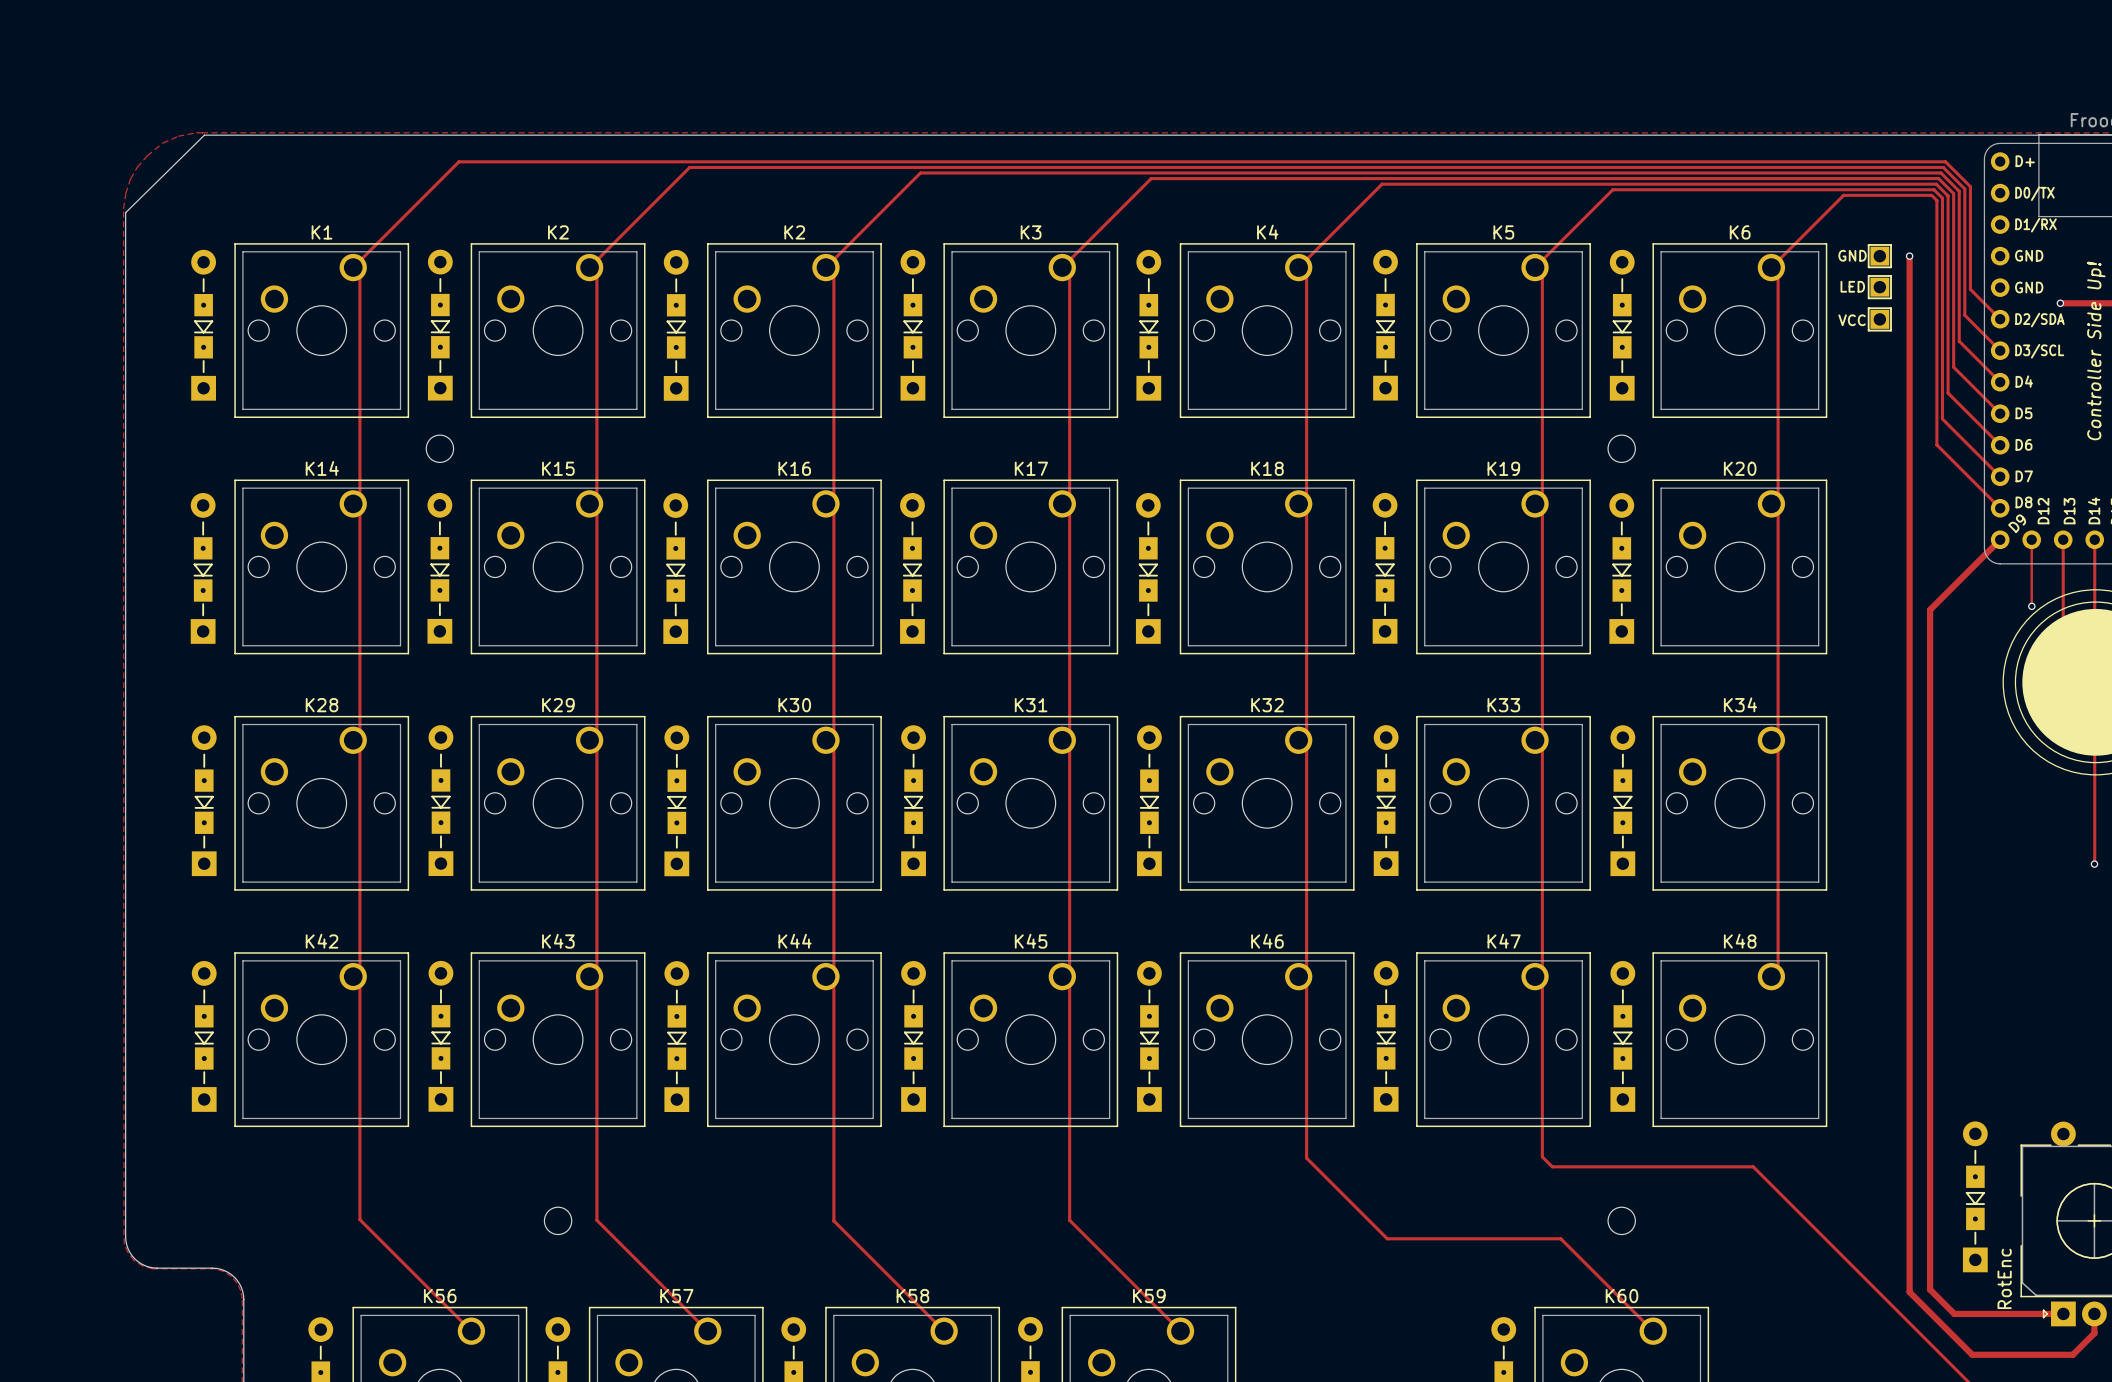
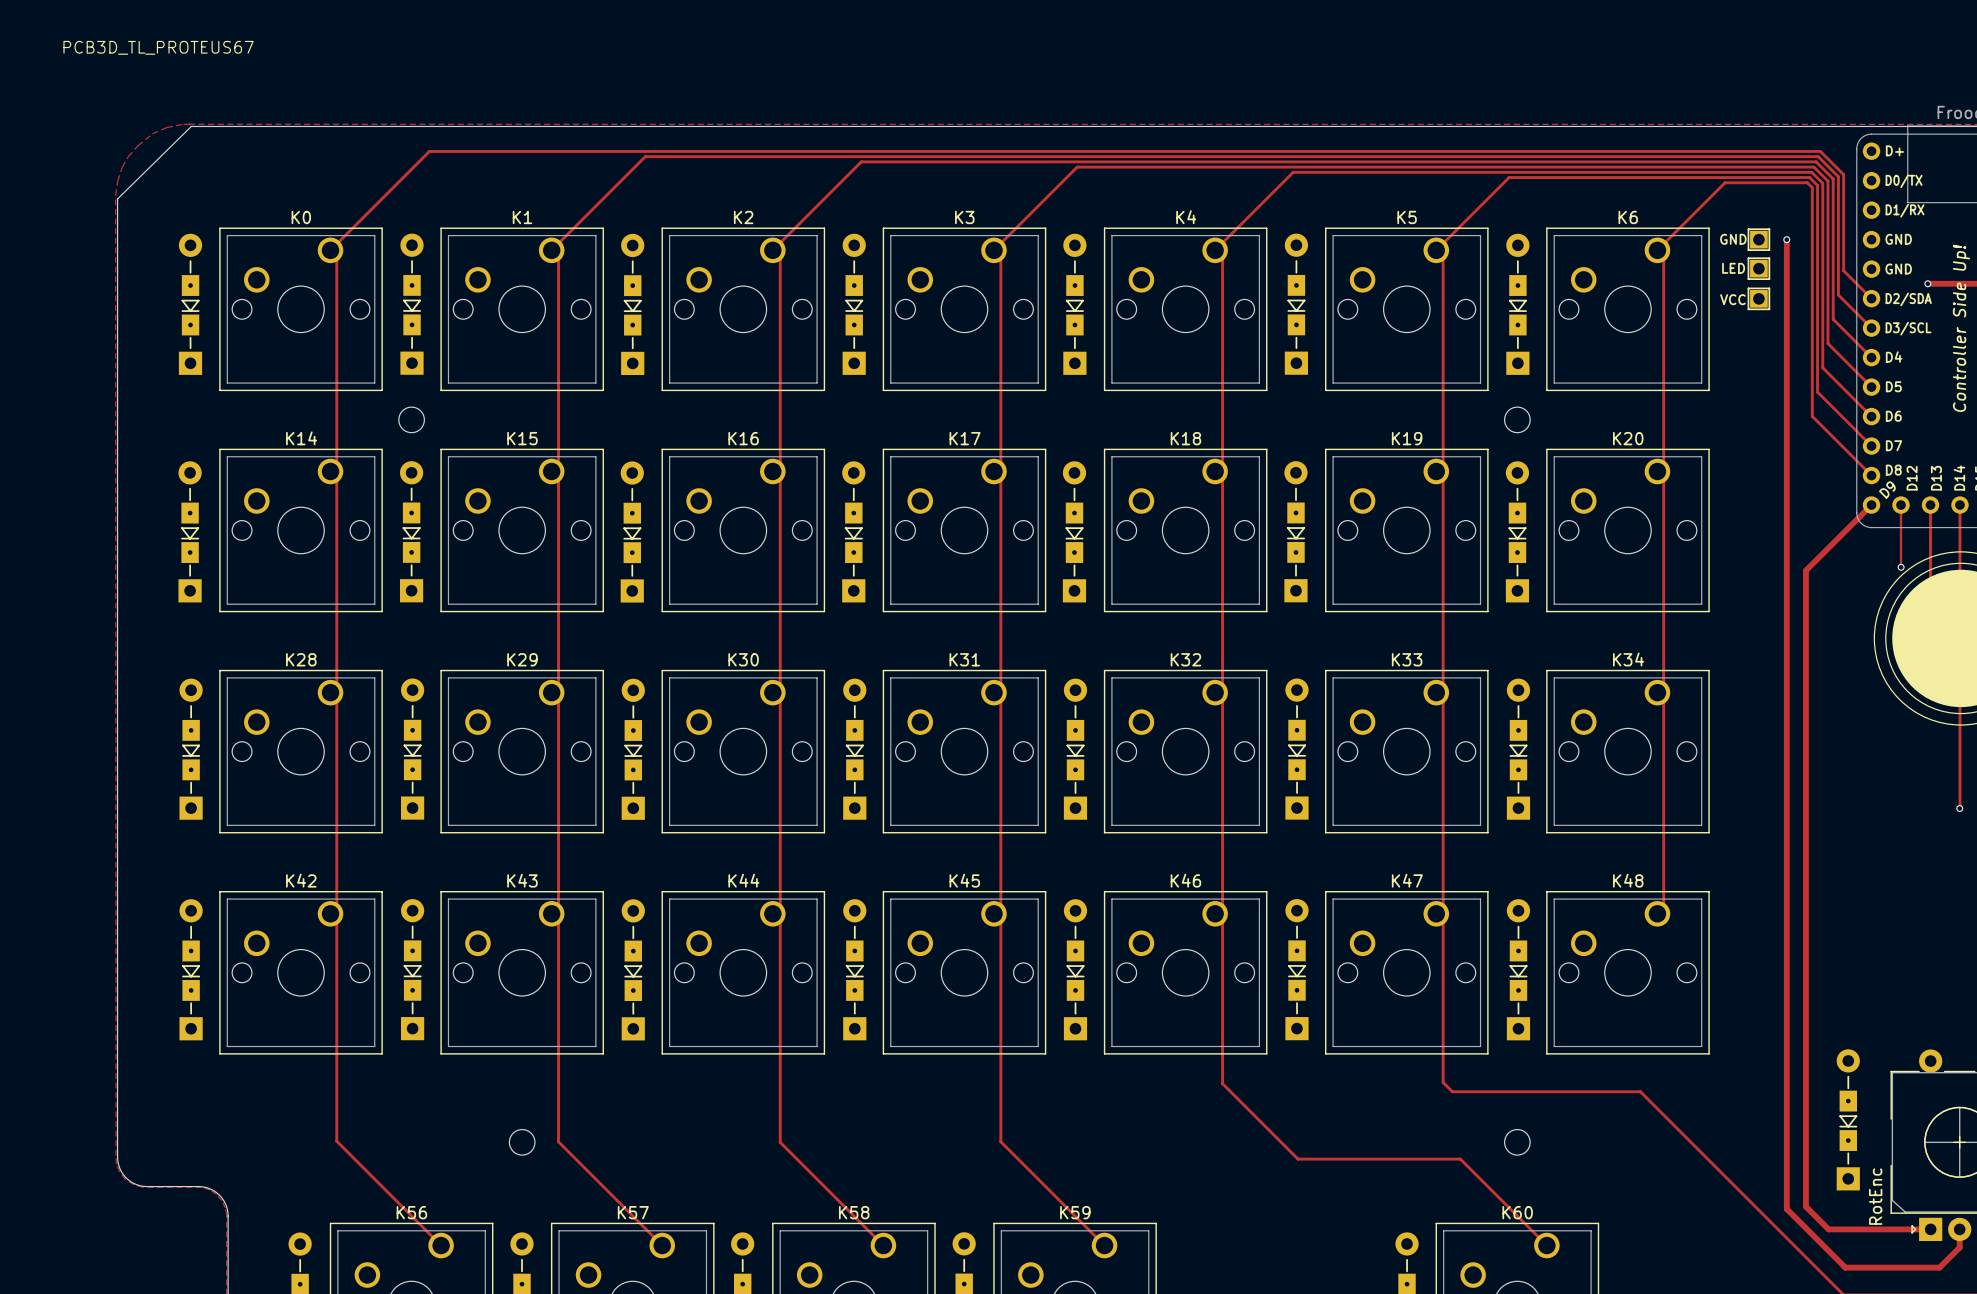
text: none -> PCB3D_TL_PROTEUS67 (158, 47)
K1 name: K1 (322, 232) -> K0 (301, 217)
K2 name: K2 (558, 232) -> K1 (522, 217)

